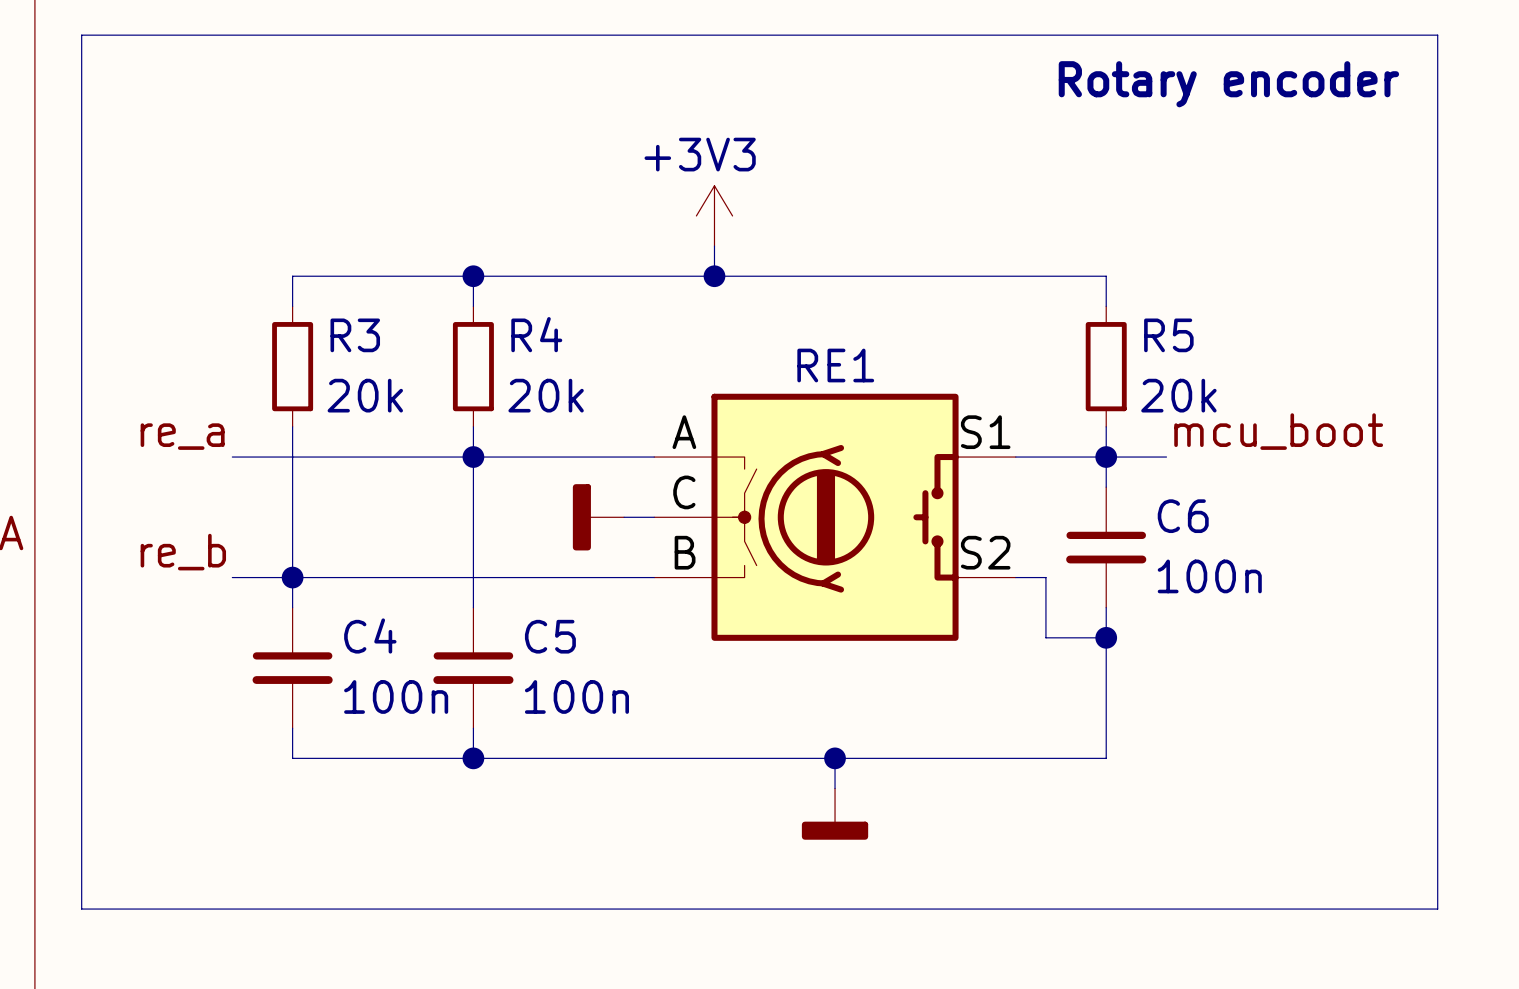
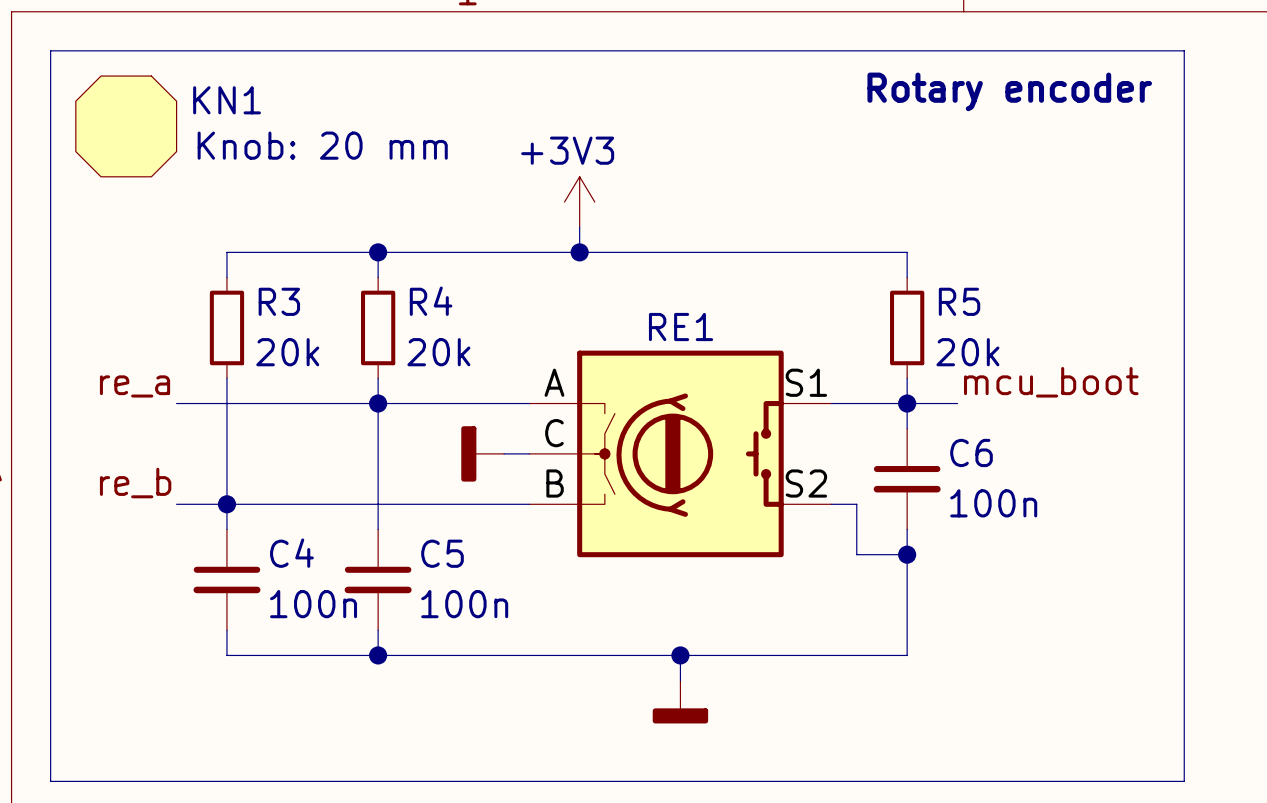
KN1: none -> (126, 126)

